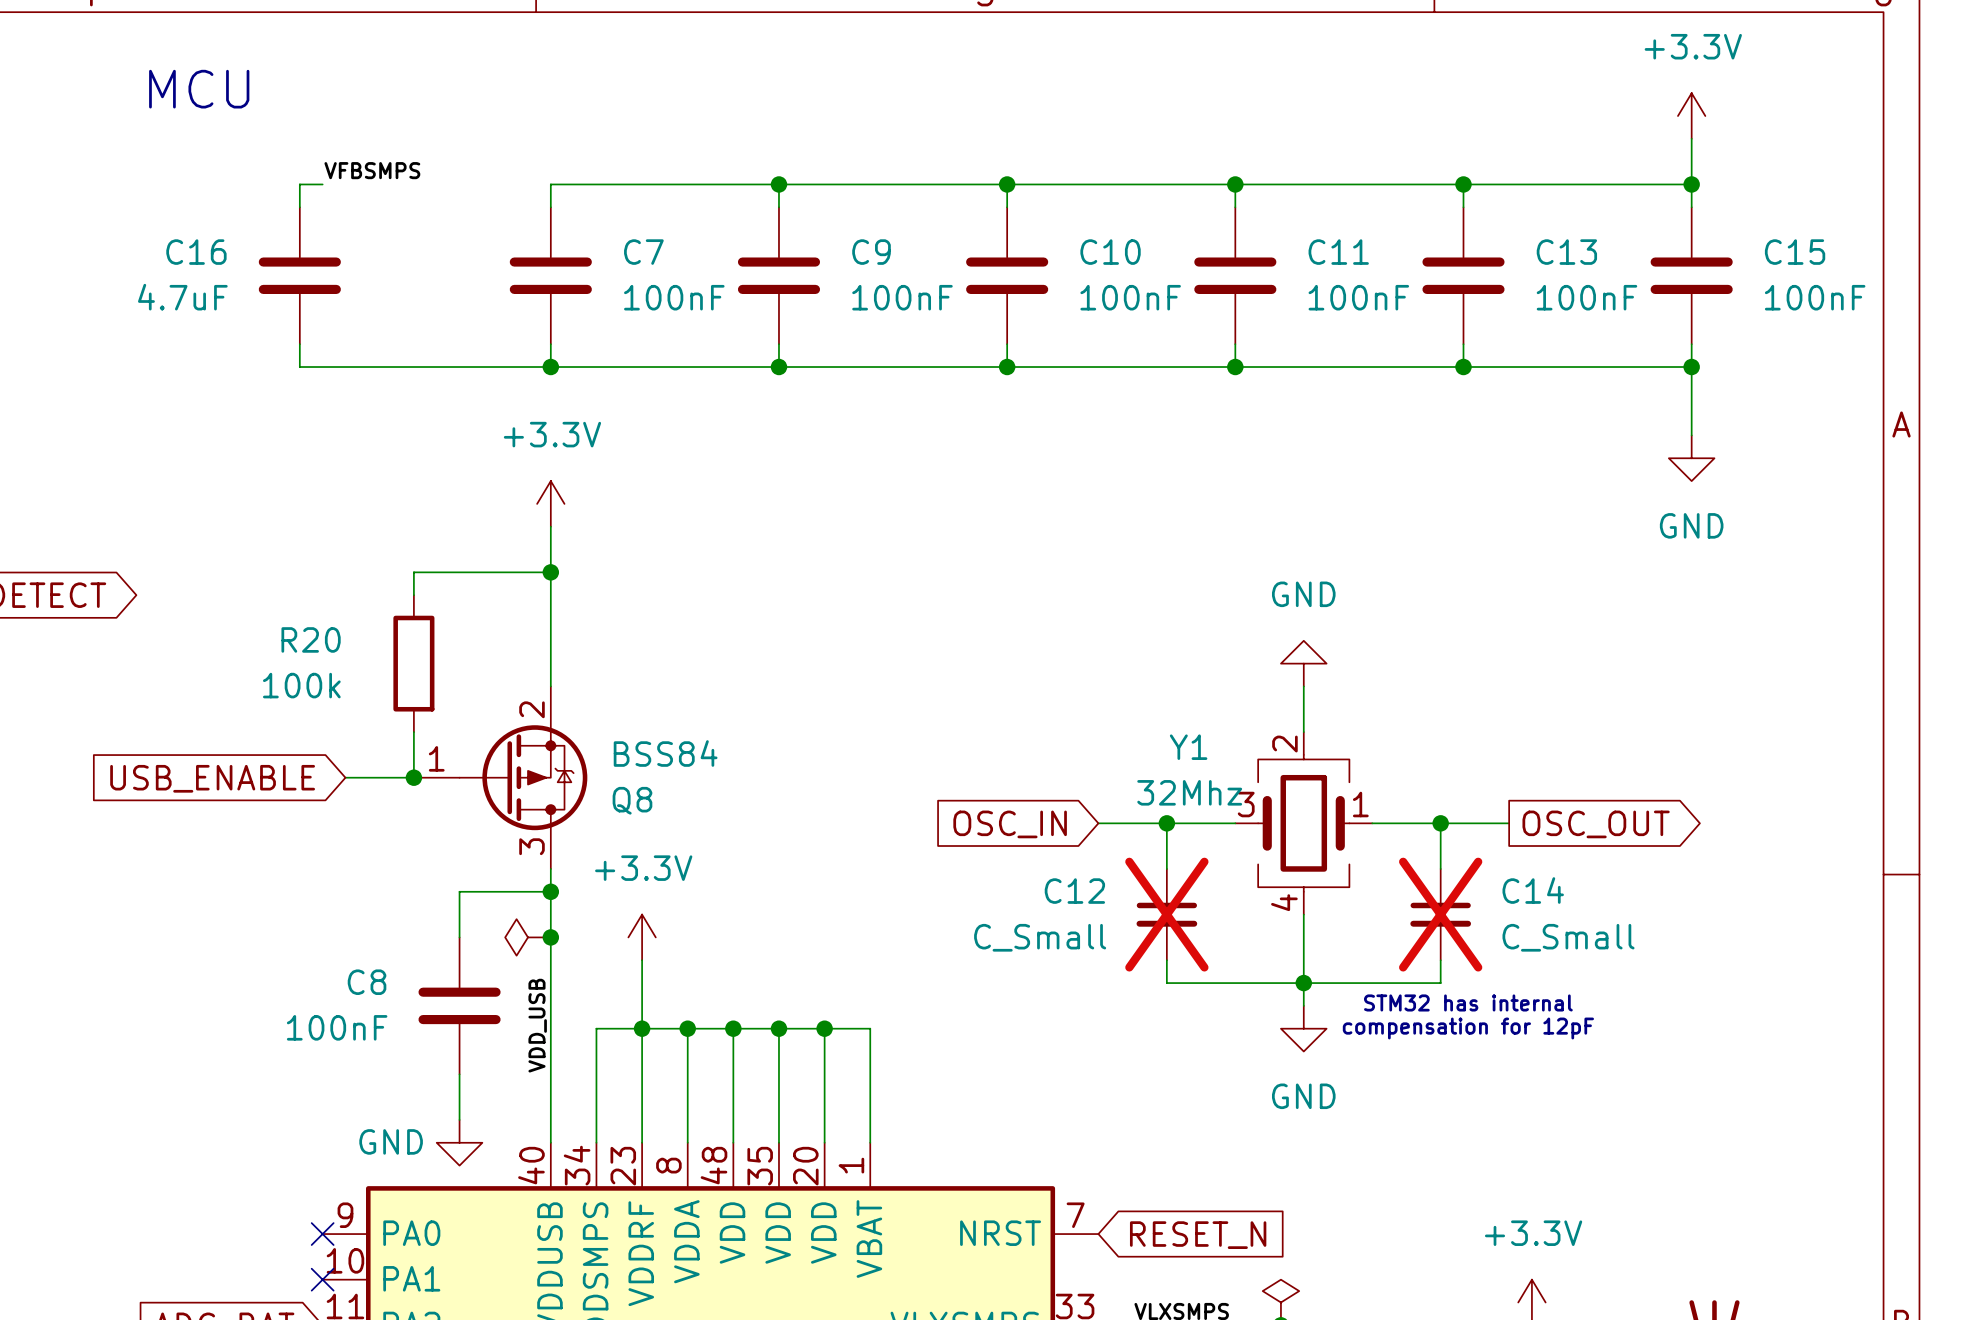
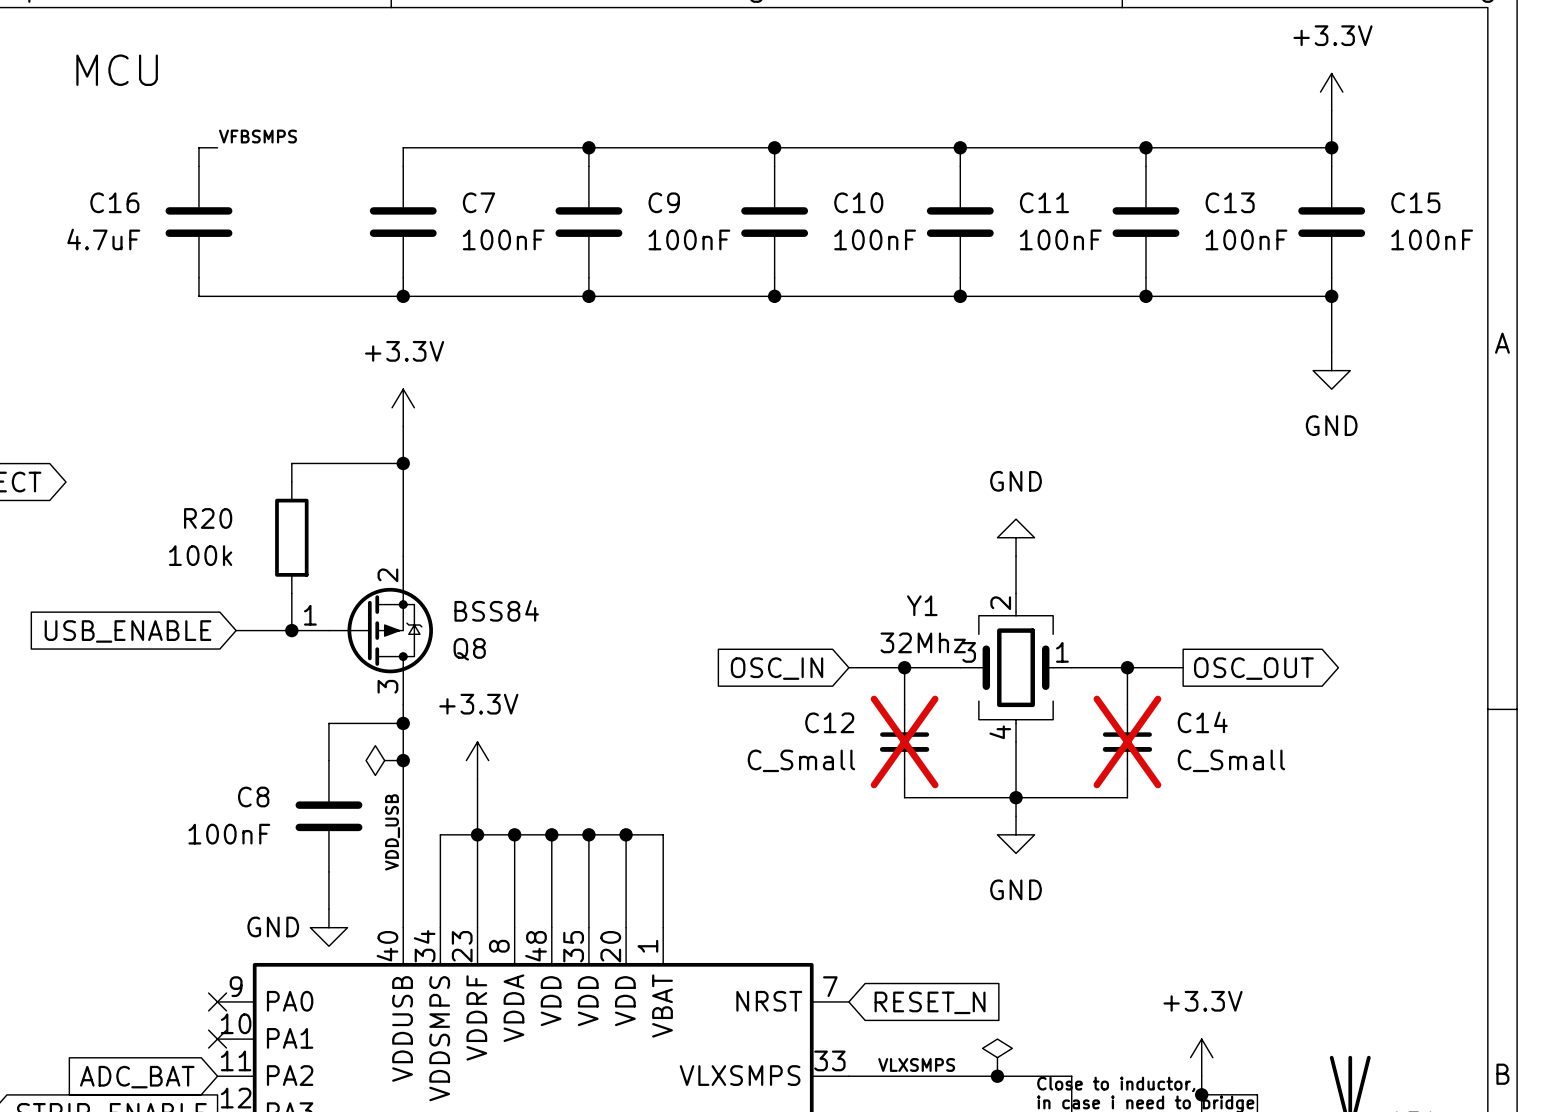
text: STM32 has internal (1468, 1002) -> none
text: compensation for 12pF (1468, 1028) -> none

